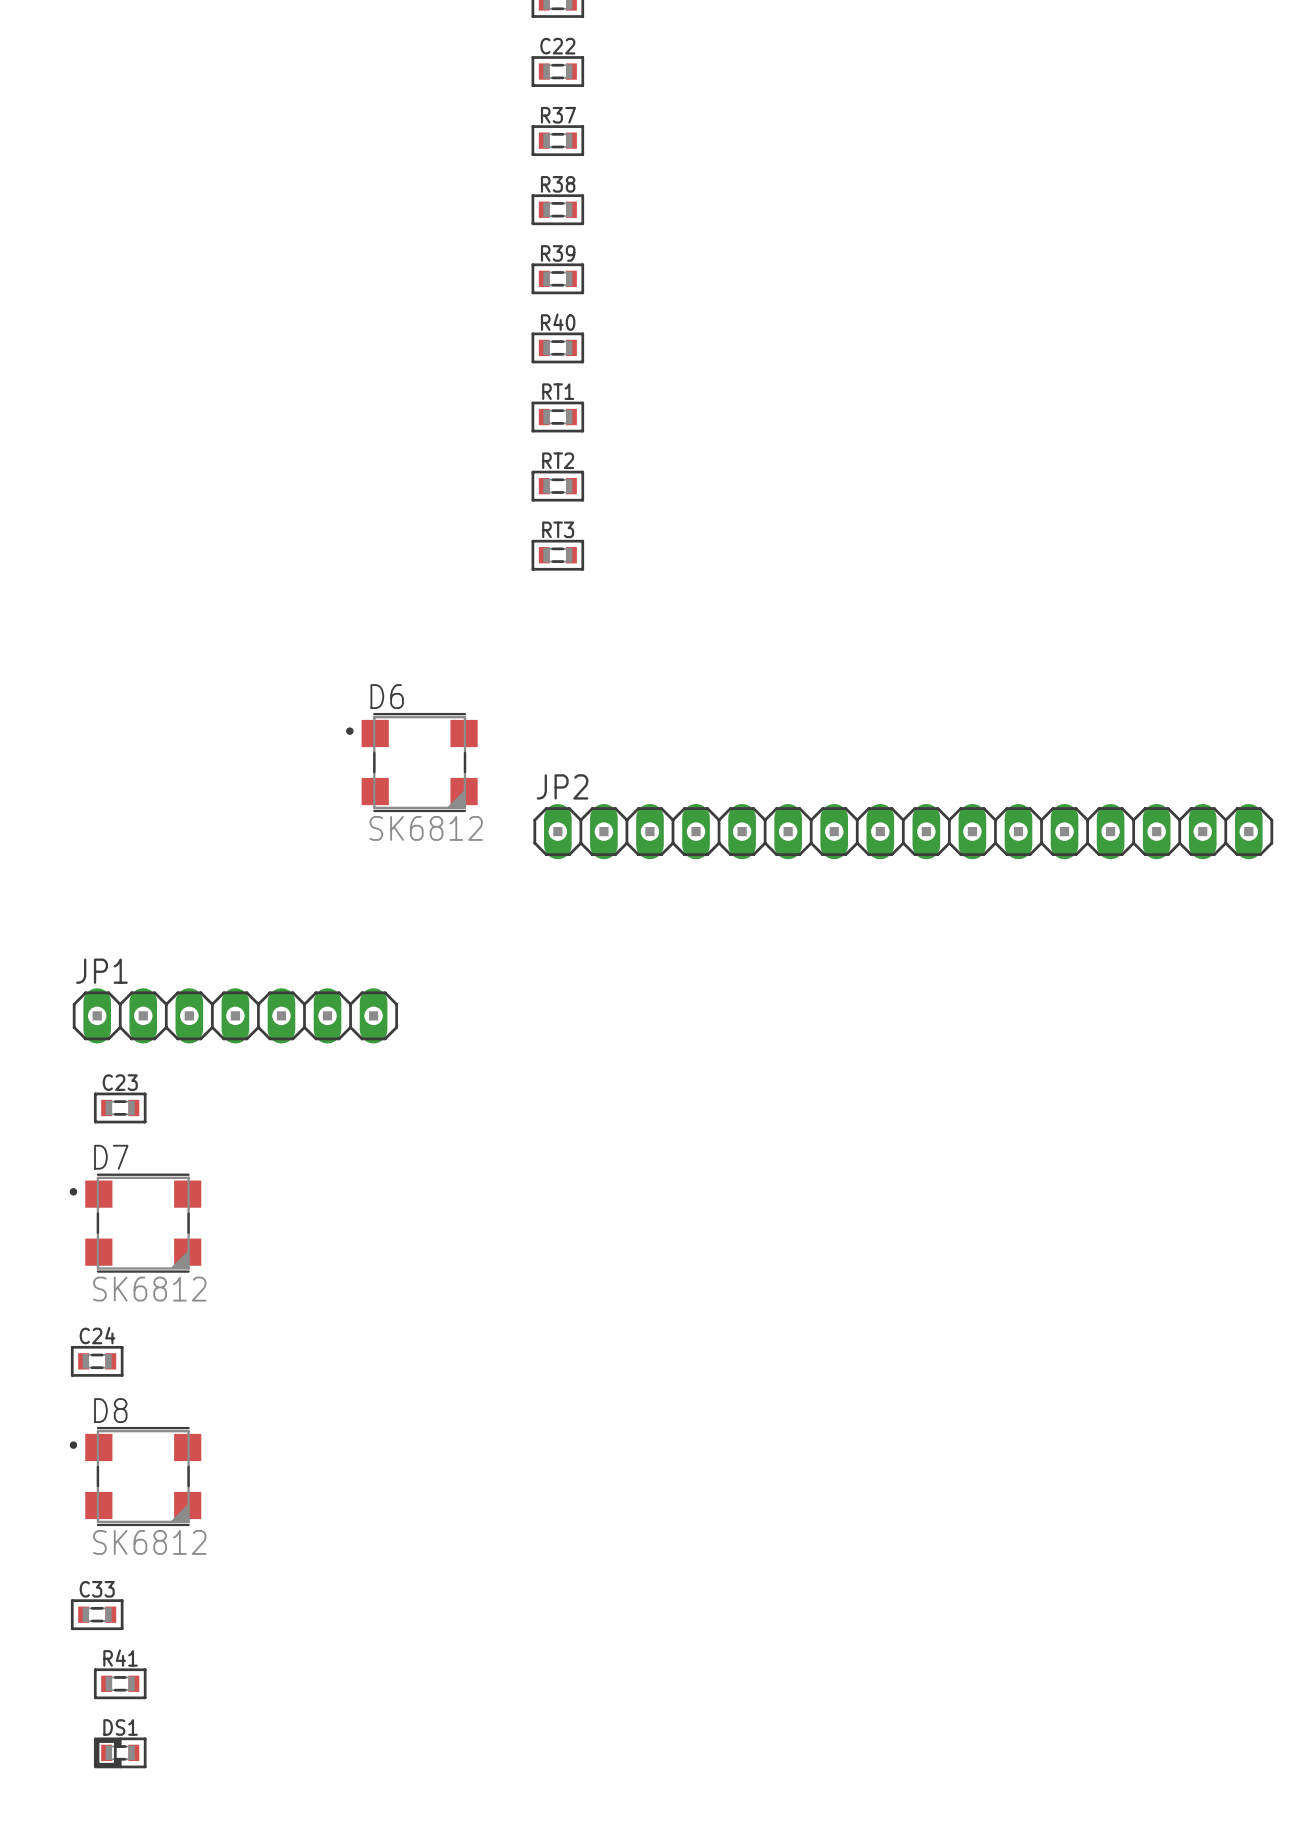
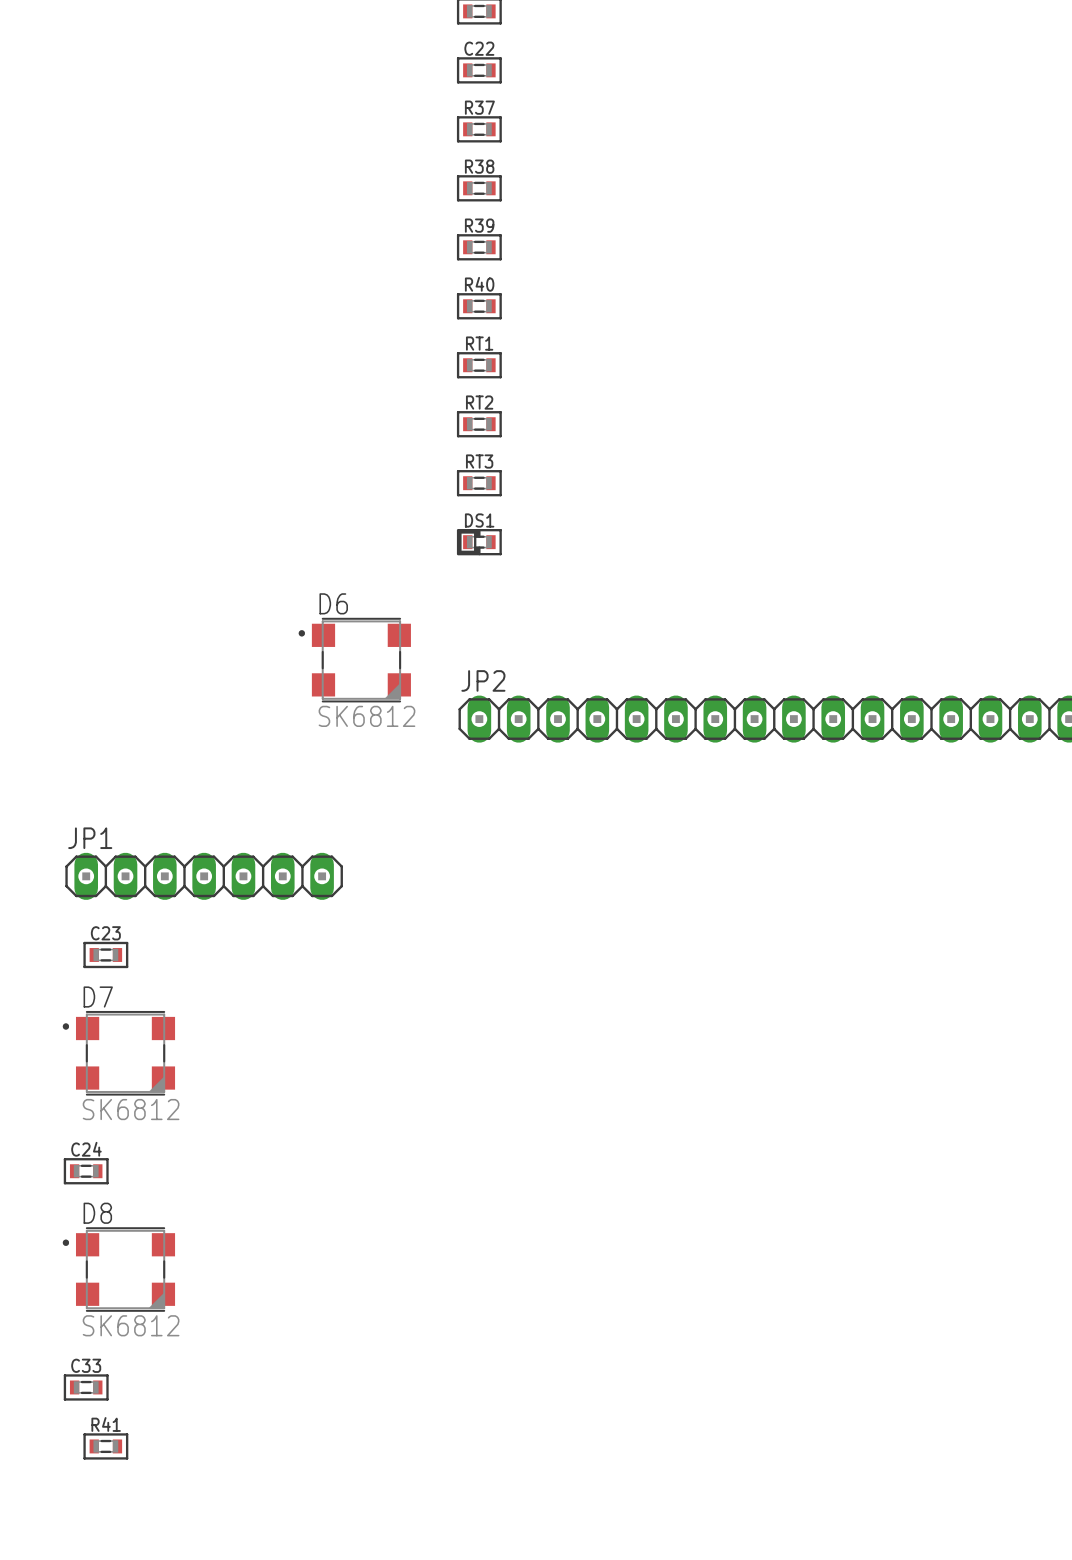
DS1 position: (120, 1752) -> (479, 542)

